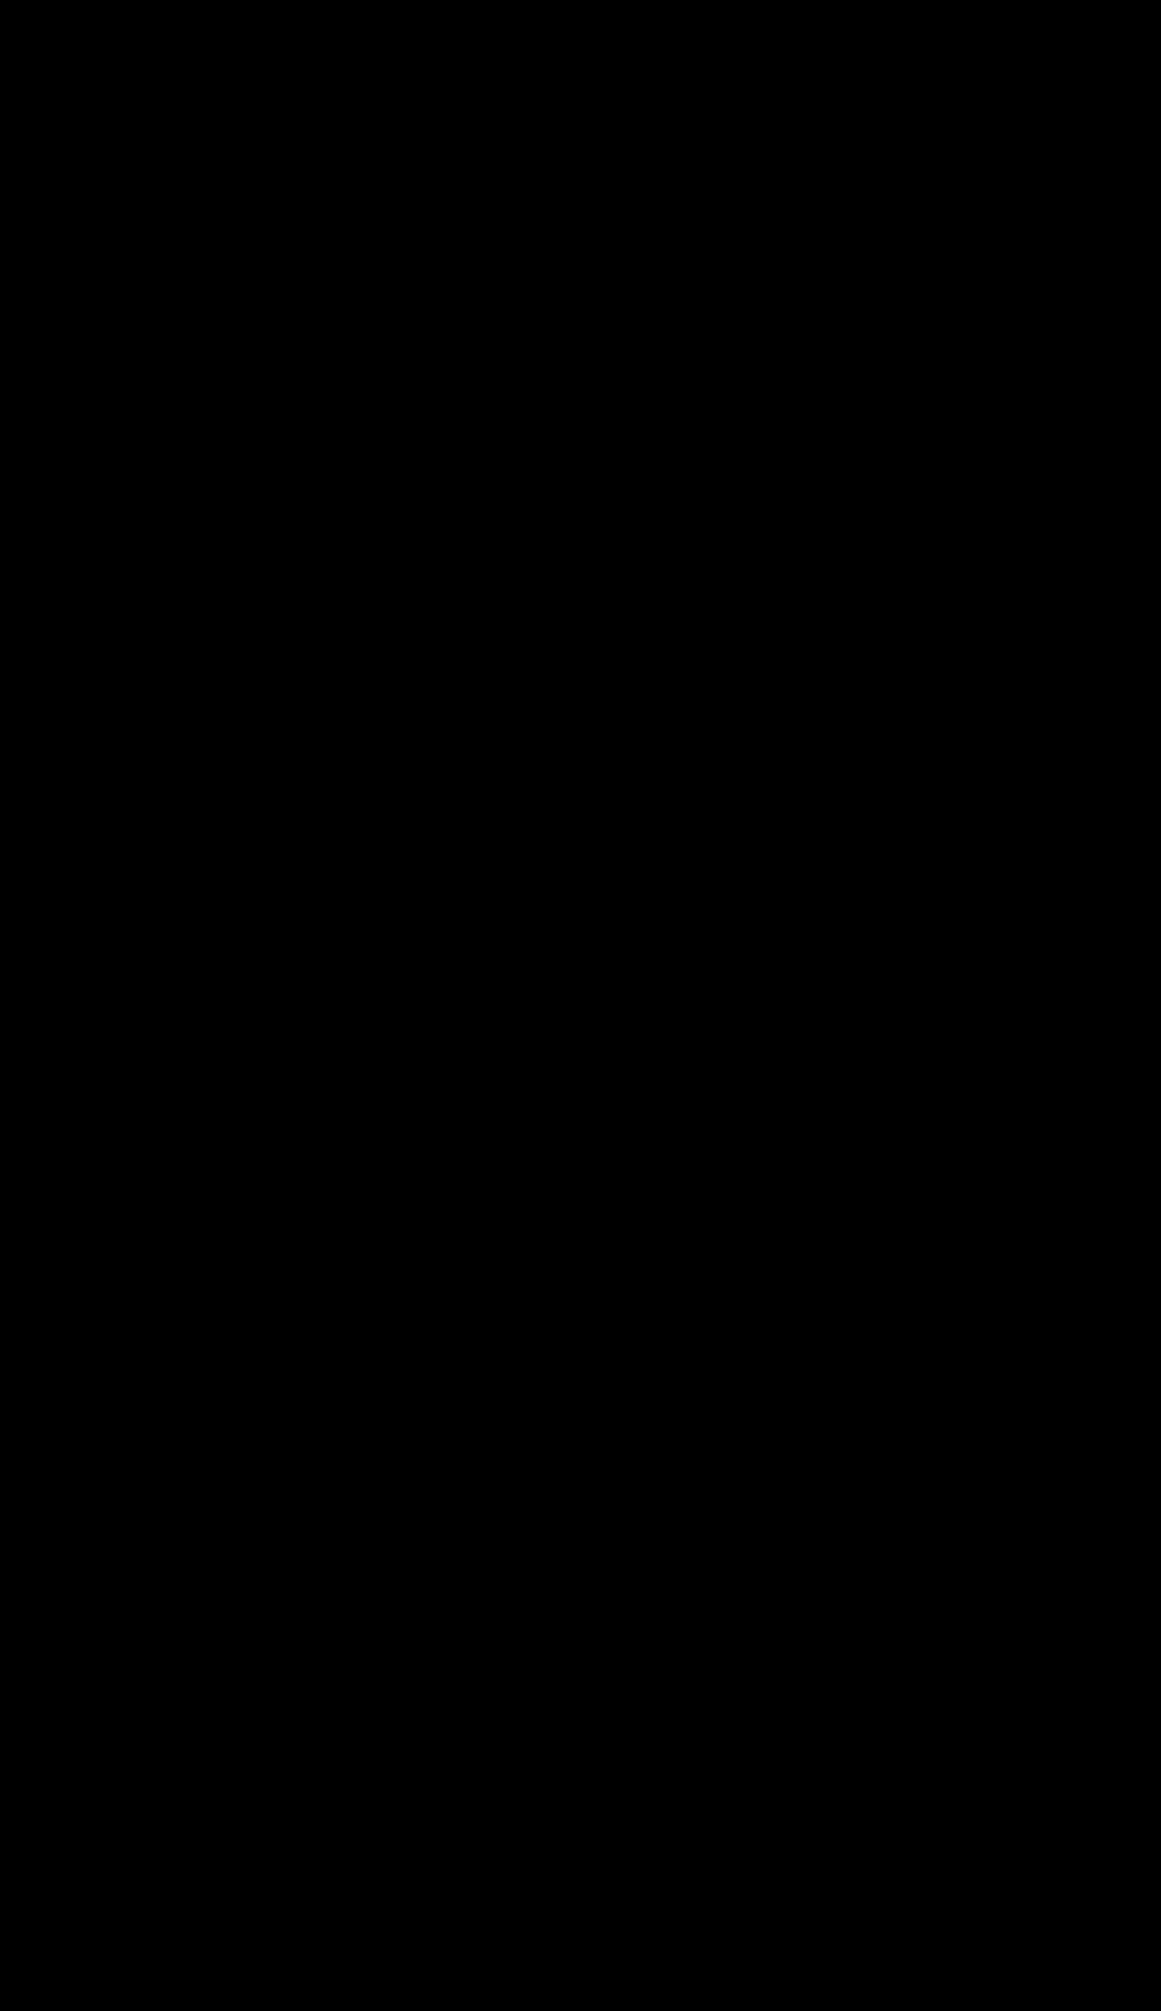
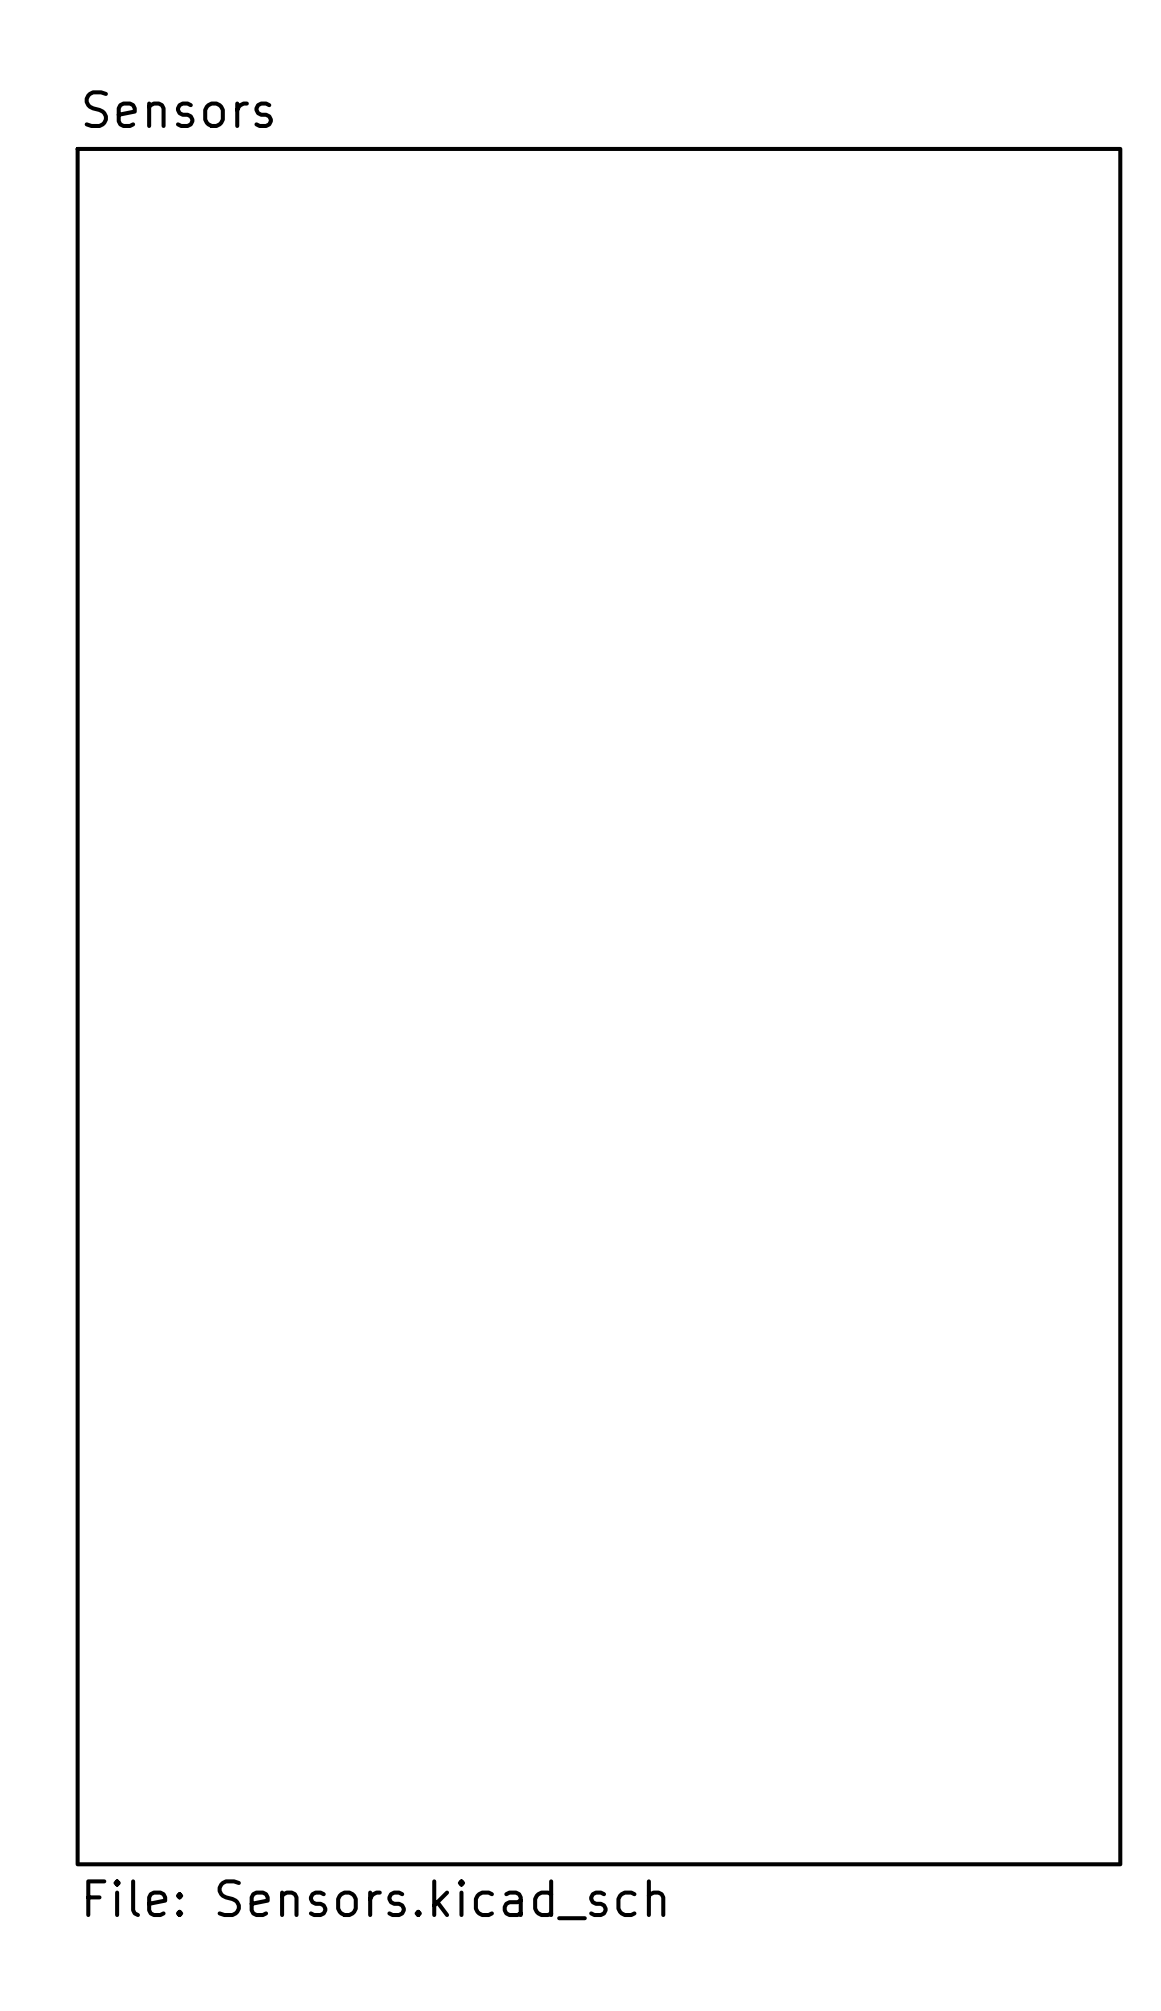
sheet Sensors: none -> File: Sensors.kicad_sch (598, 1006)

